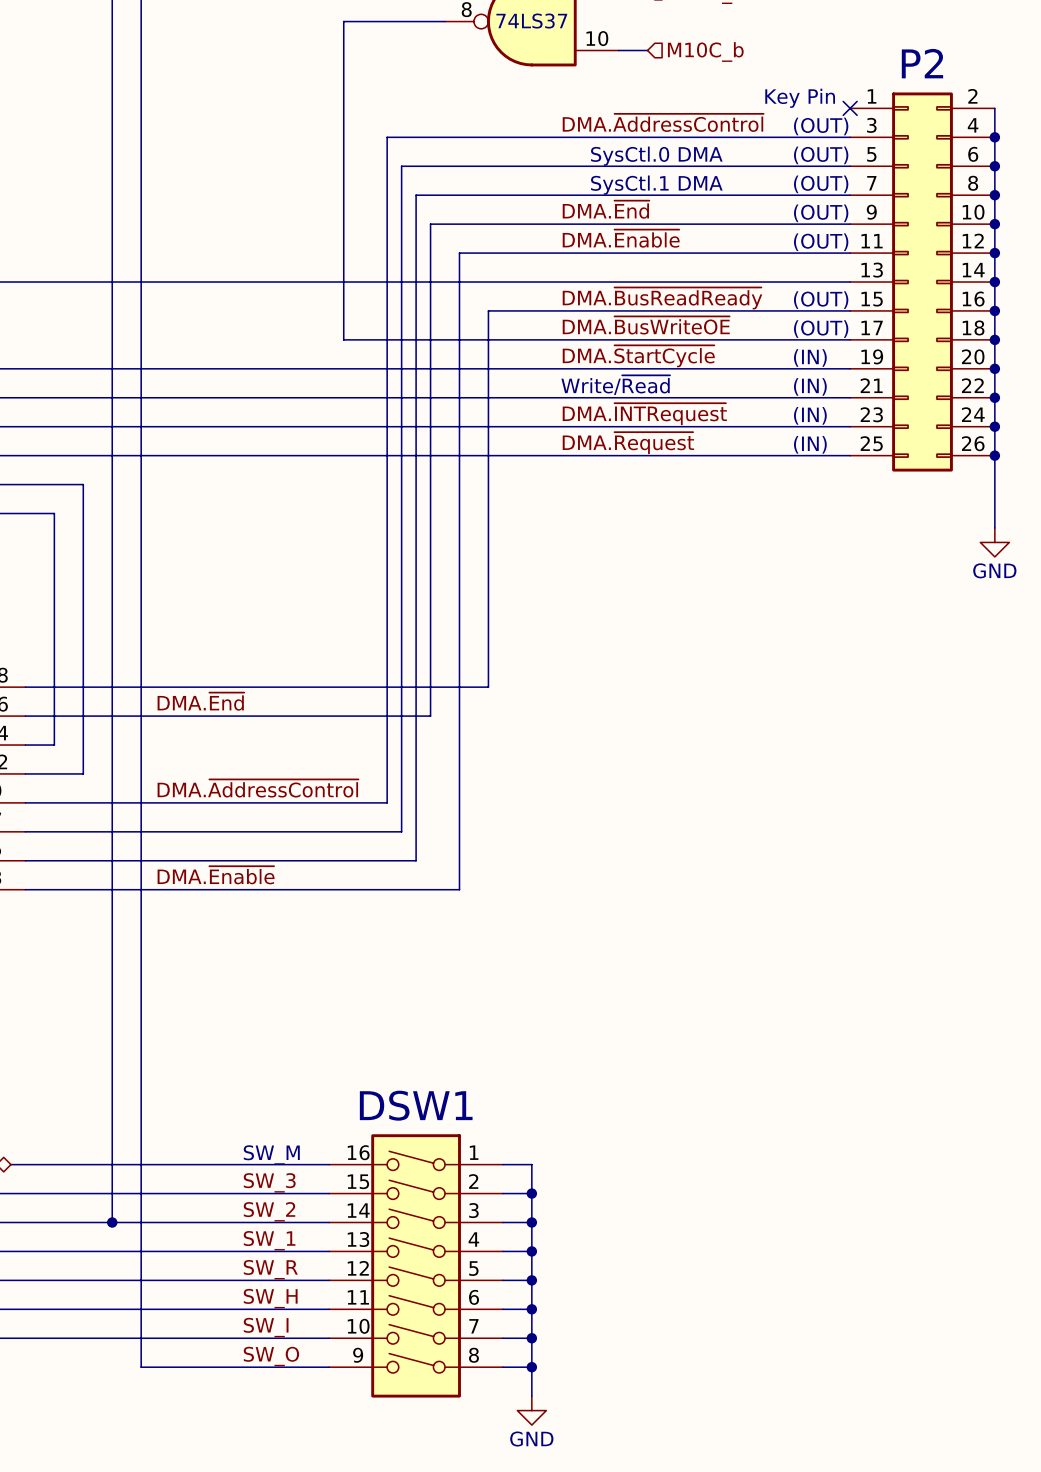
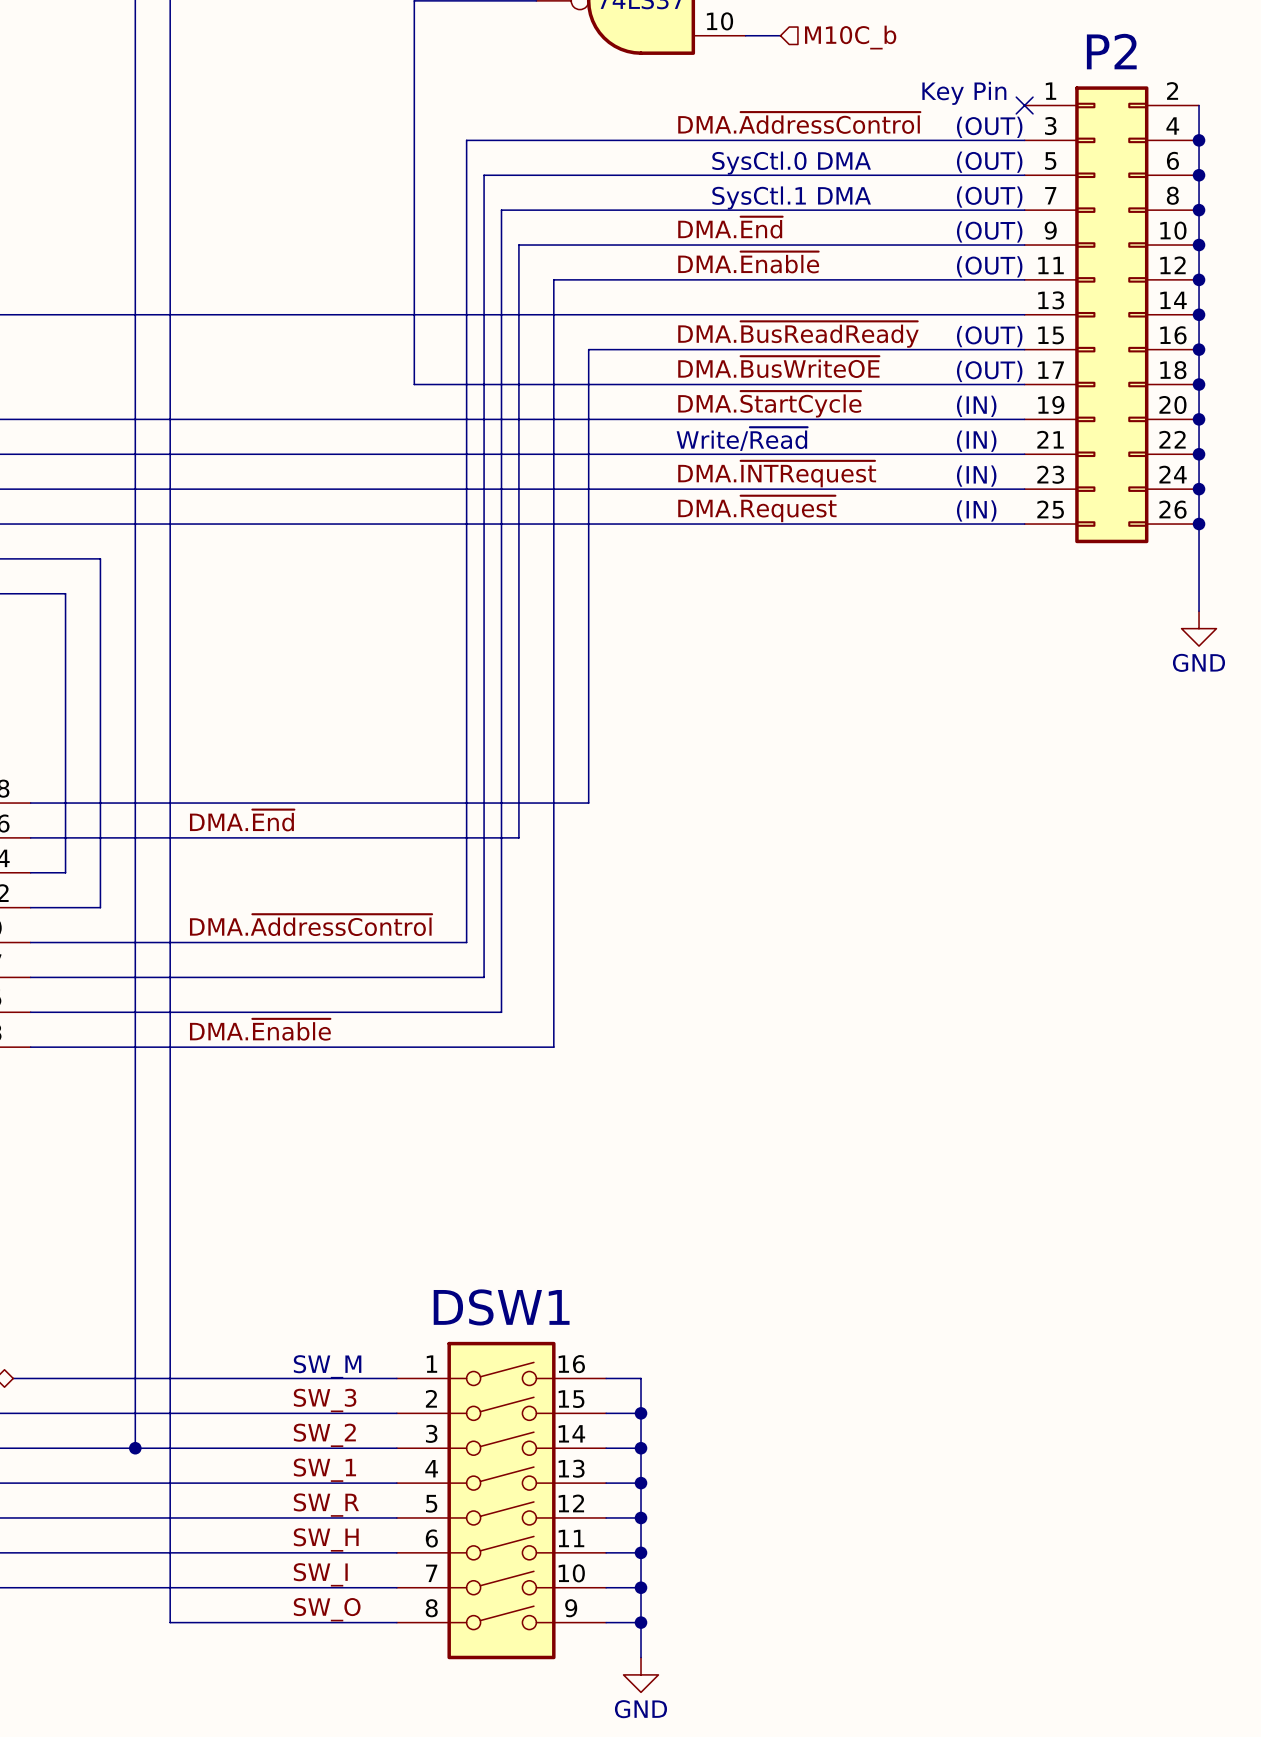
DSW1 flip: as is (416, 1265) -> left-right (501, 1500)

